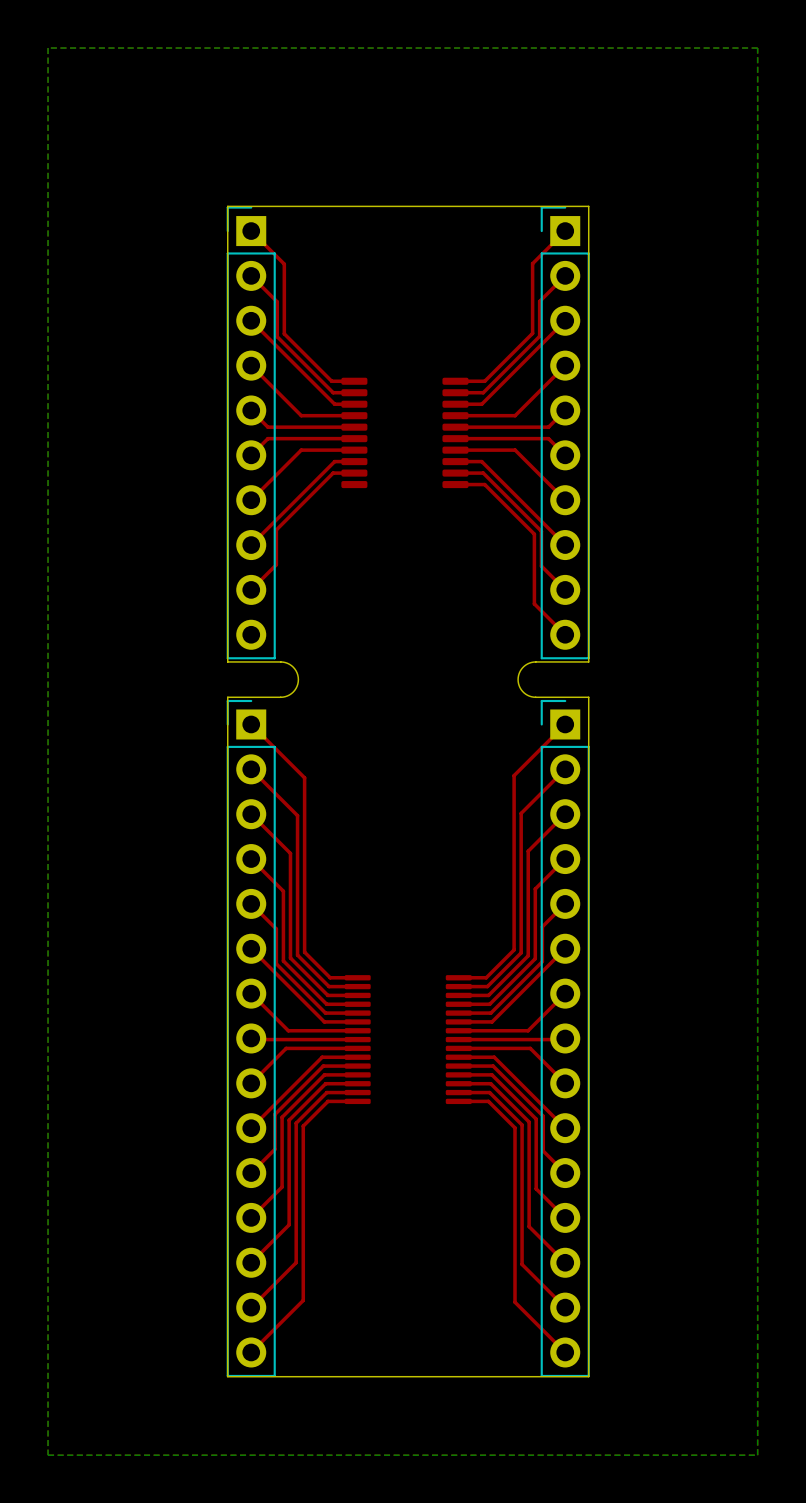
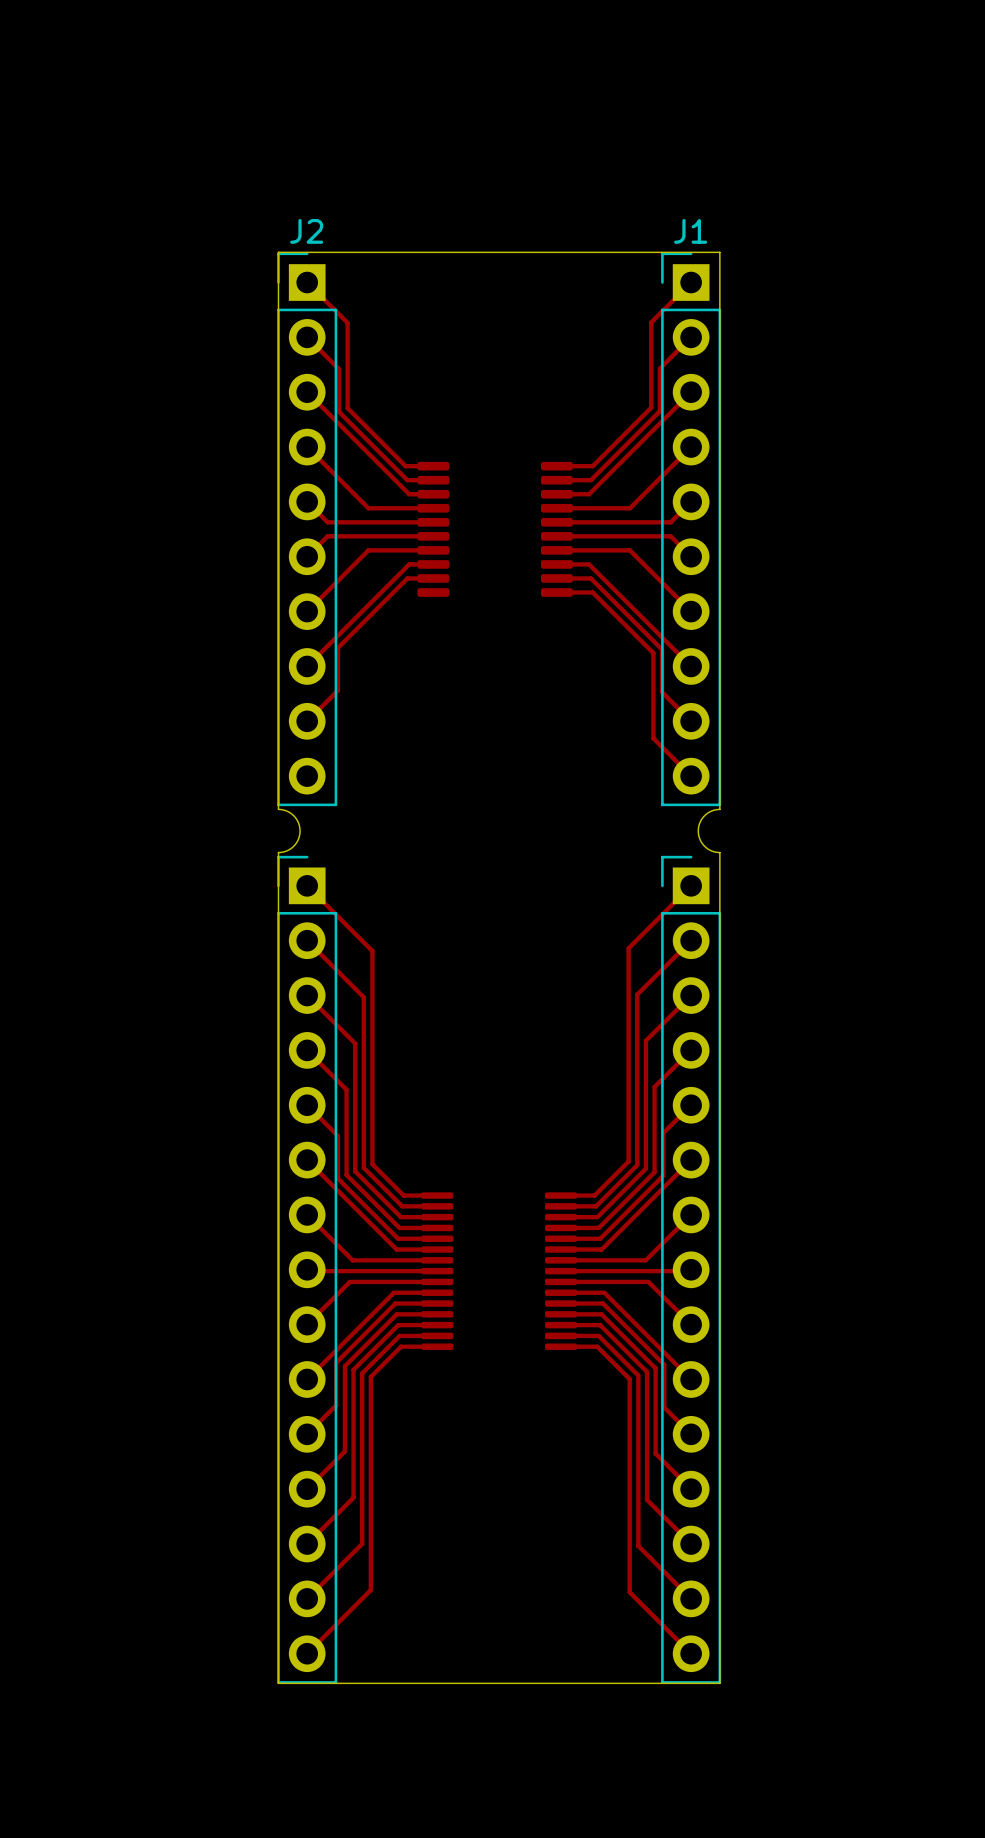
bottom zone outline: (757, 48) (48, 48) (48, 1455) (757, 1455) (757, 48) -> none
J2 name: none -> J2 (306, 231)
J1 name: none -> J1 (690, 231)
board edge: (227, 661) (285, 662) (294, 668) (298, 679) (294, 690) (285, 696) (227, 697) -> (278, 809) (286, 811) (293, 815) (298, 822) (300, 831) (298, 839) (293, 846) (286, 850) (278, 852)
board edge: (588, 661) (531, 662) (521, 669) (518, 679) (521, 689) (531, 696) (588, 697) -> (719, 809) (705, 814) (699, 823) (698, 831) (703, 845) (709, 850) (719, 852)

